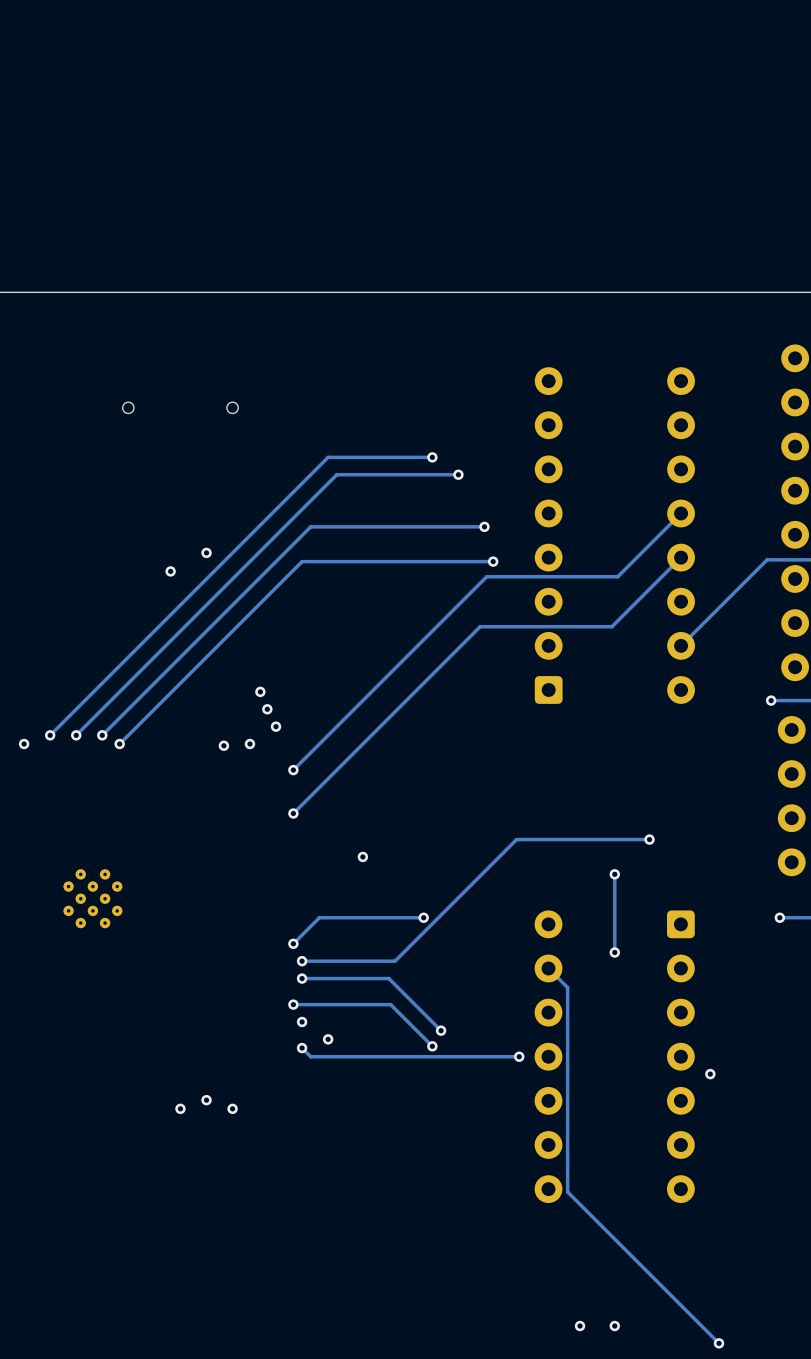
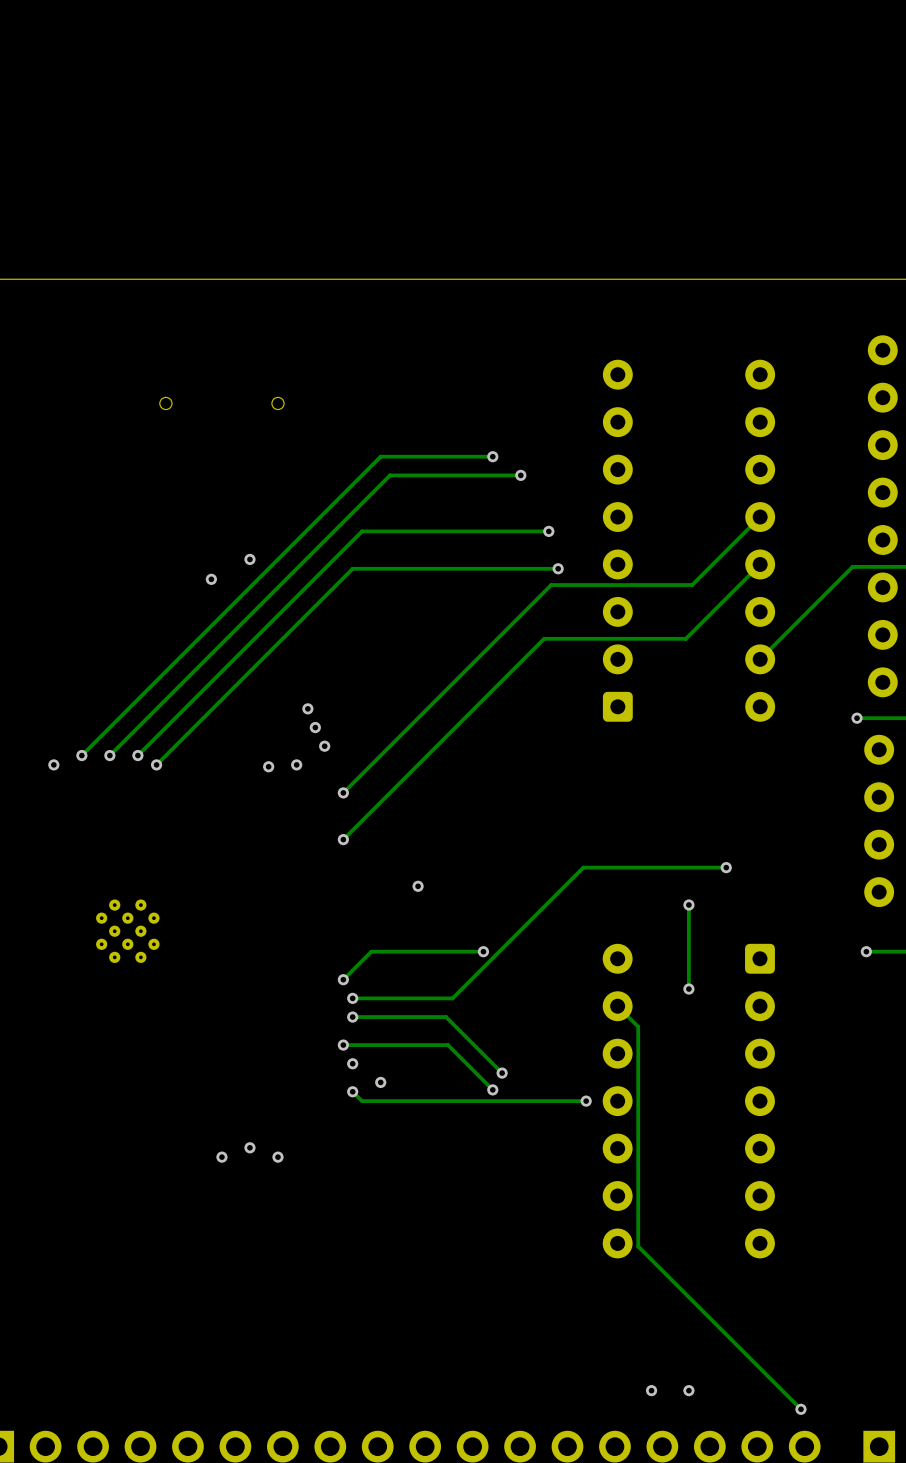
via: (710, 1074) -> none

